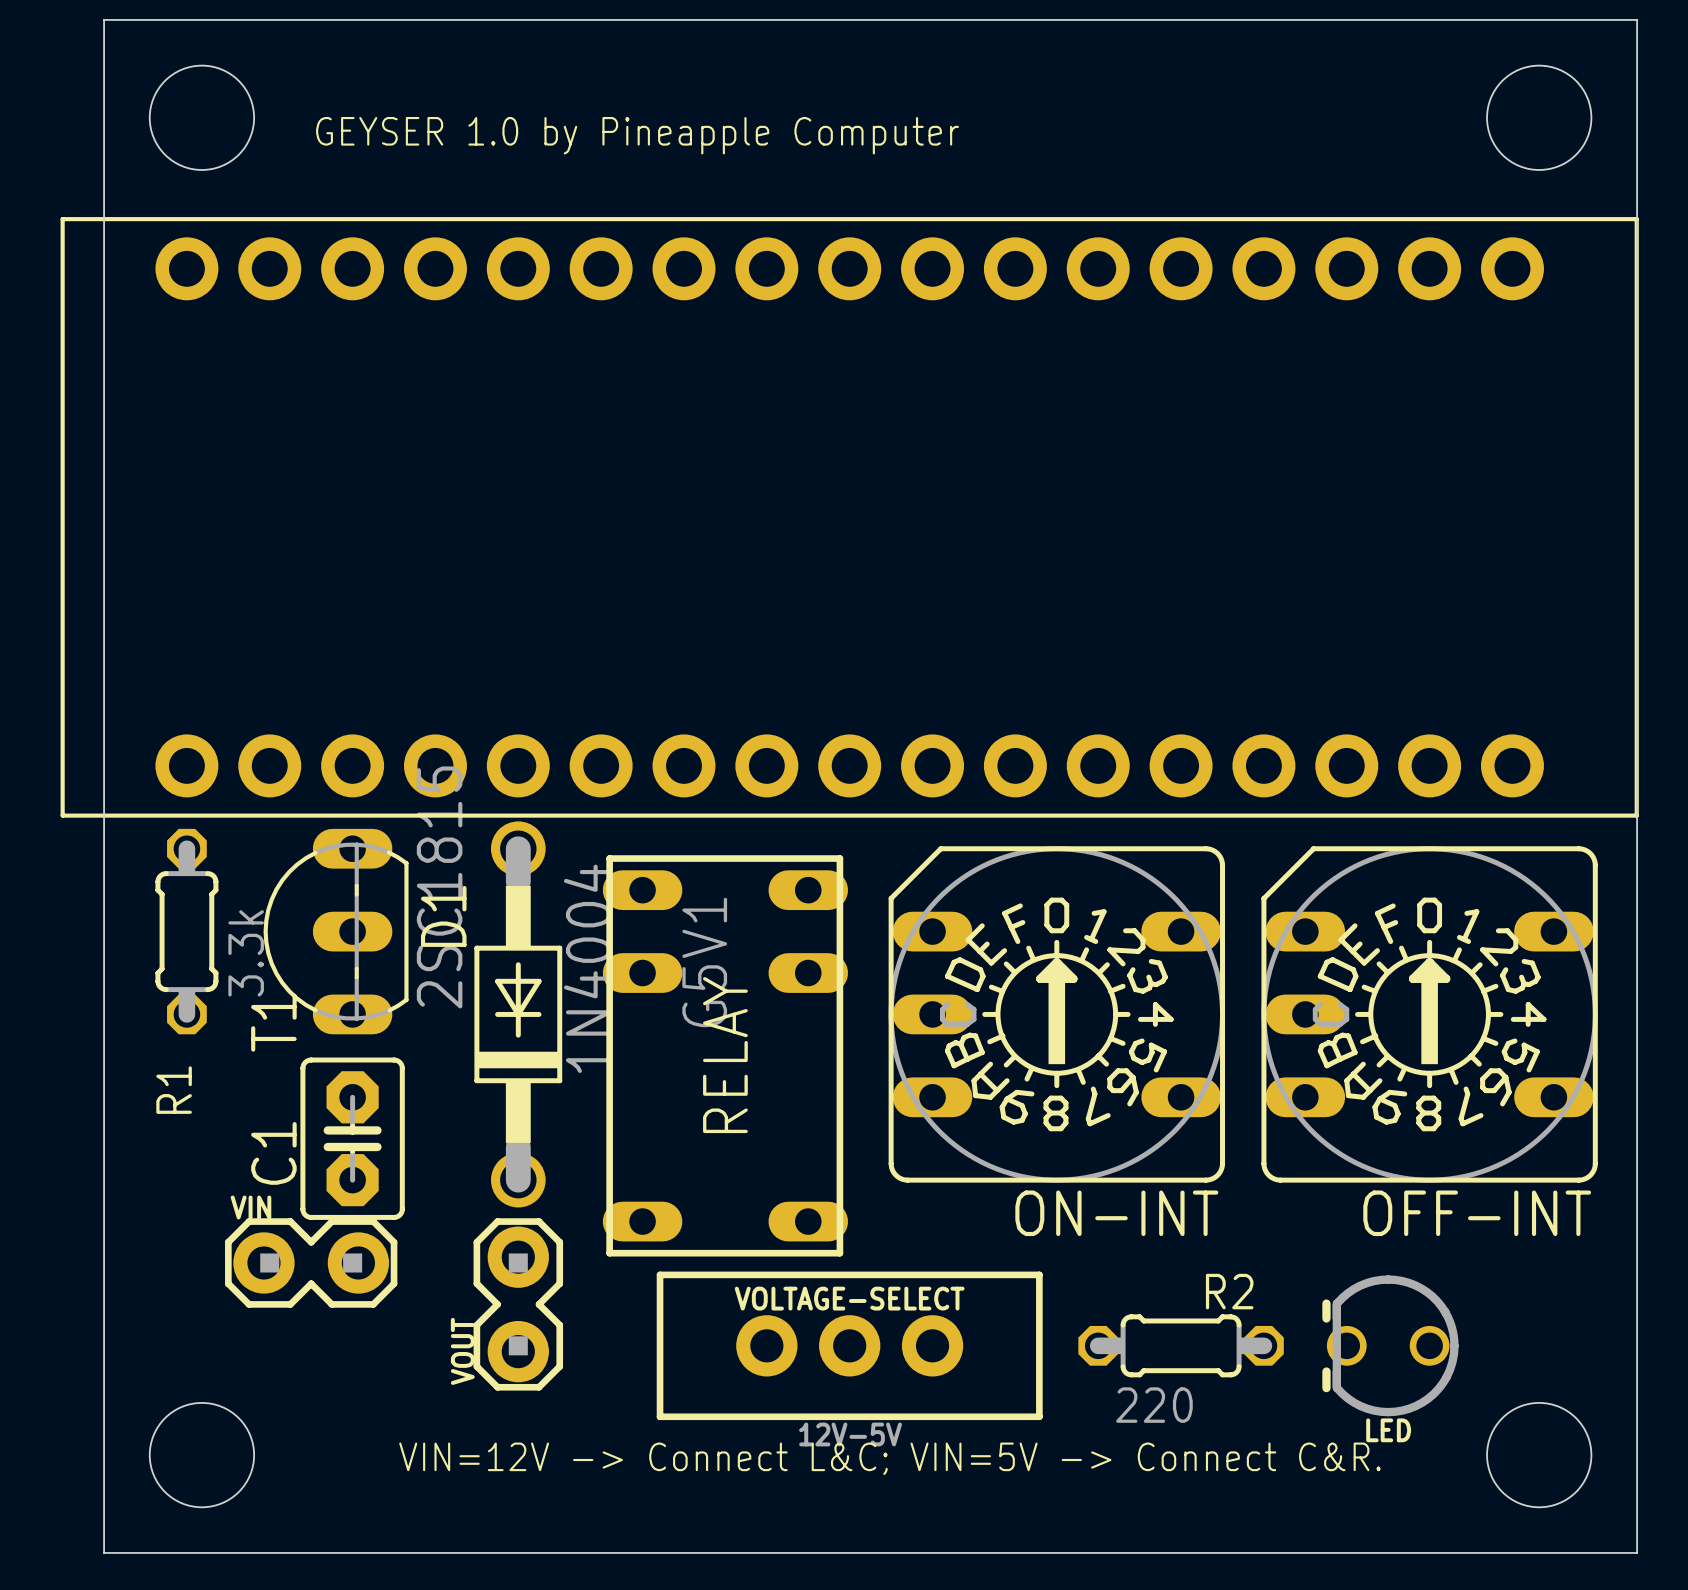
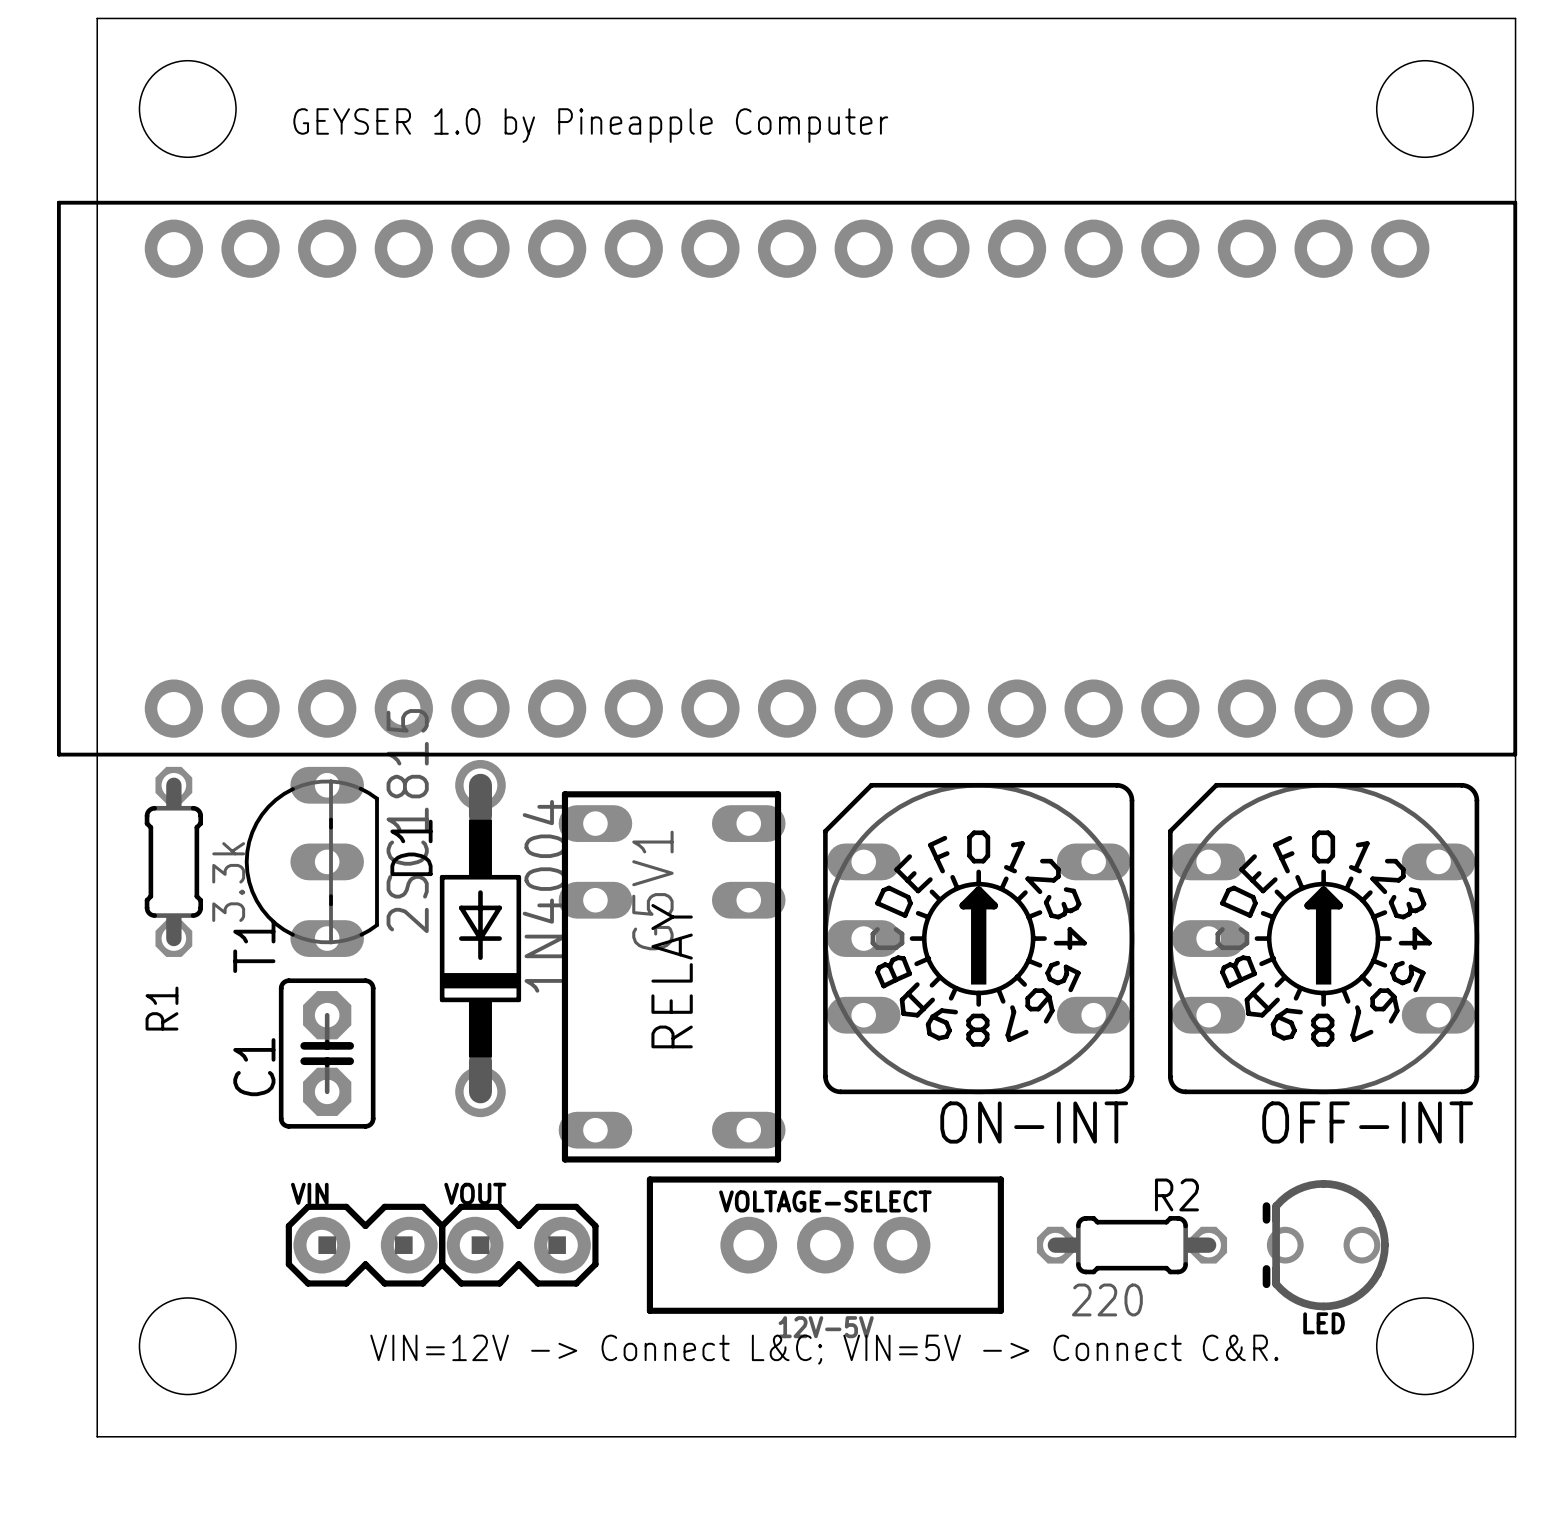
VIN position: (311, 1262) -> (365, 1245)
VOUT rotation: 0° (518, 1304) -> 90° clockwise (518, 1245)
VOLTAGE-SELECT position: (849, 1345) -> (825, 1245)
R2 position: (1181, 1345) -> (1131, 1245)
LED position: (1390, 1345) -> (1325, 1245)

